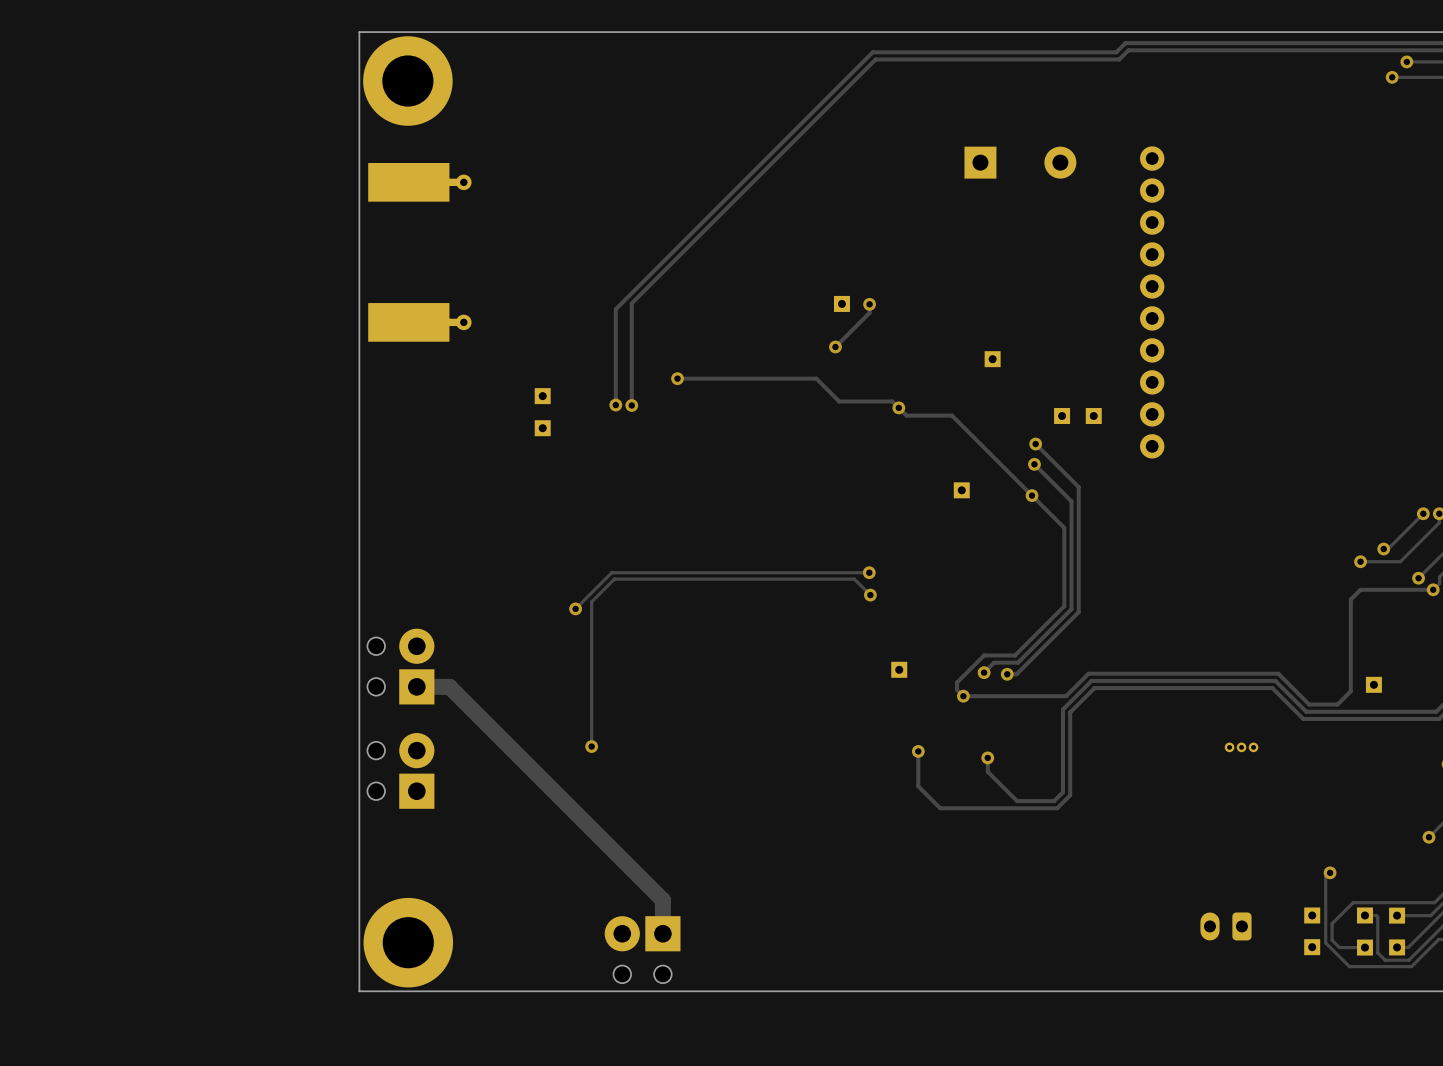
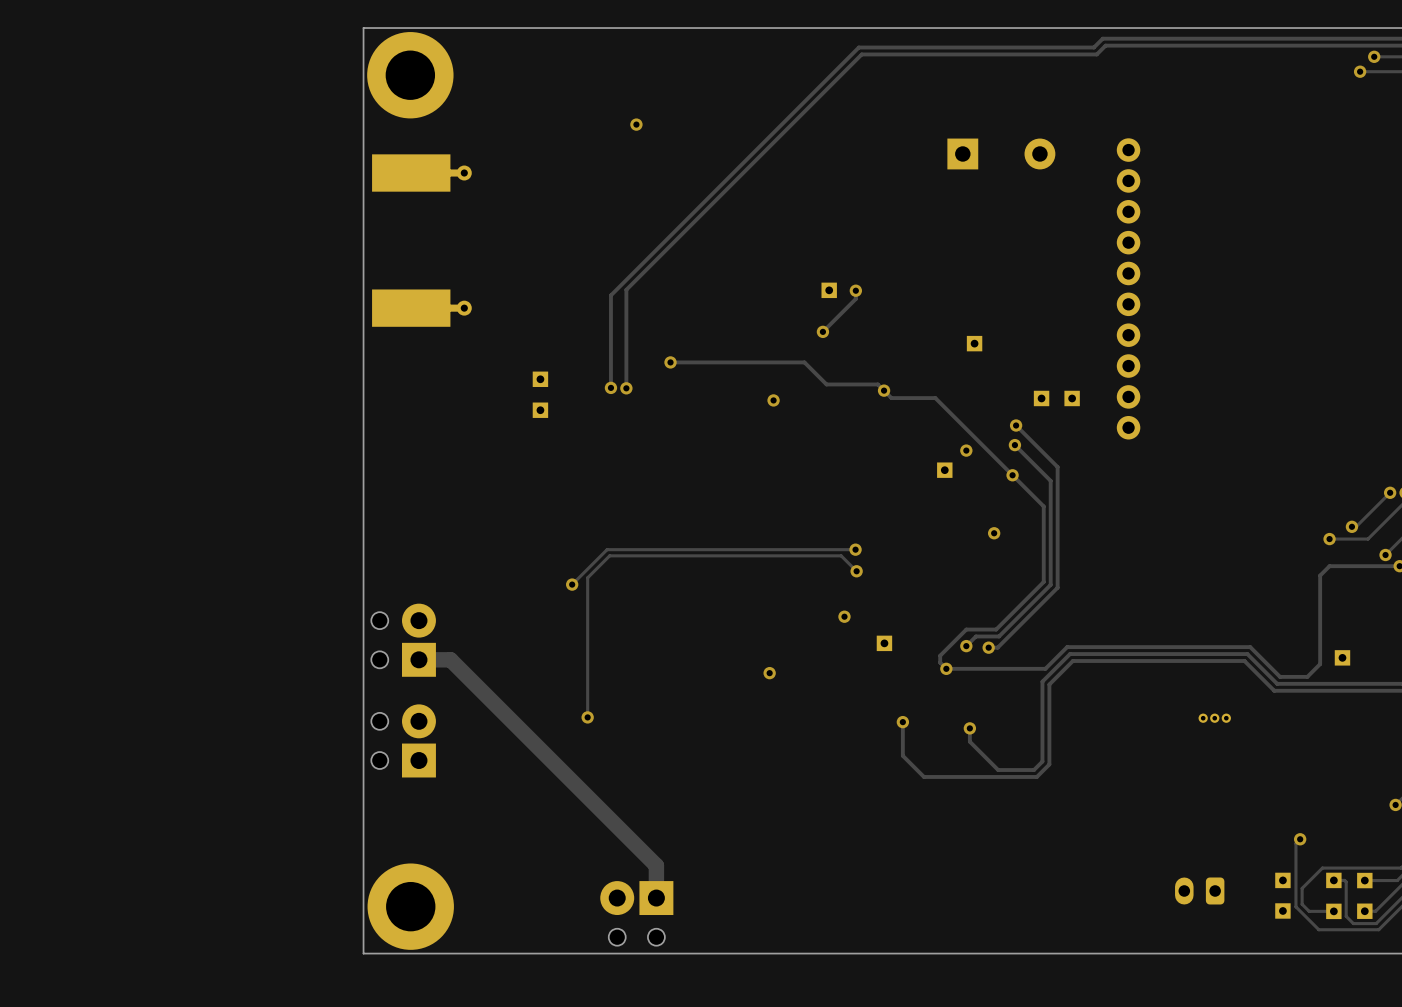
via: none -> (636, 124)
via: none -> (773, 400)
via: none -> (966, 450)
via: none -> (994, 533)
via: none -> (844, 616)
via: none -> (769, 673)

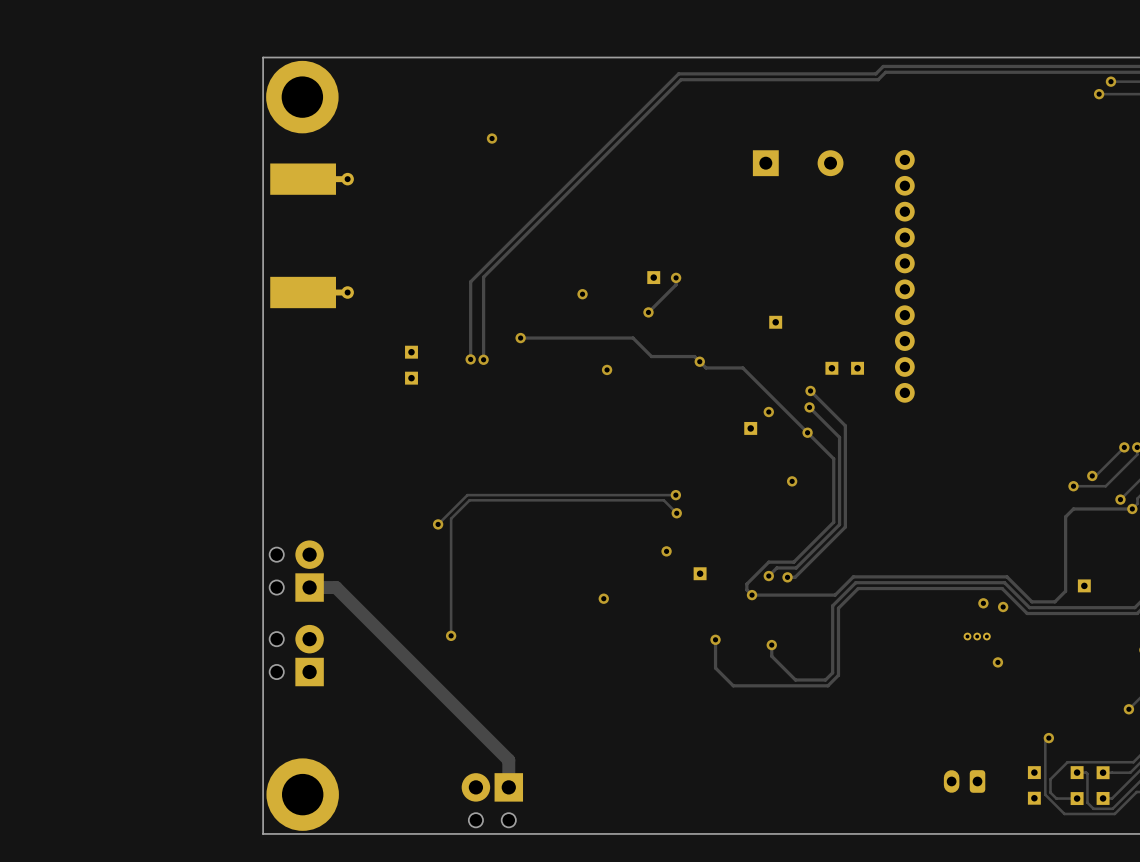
via: none -> (582, 294)
via: none -> (983, 603)
via: none -> (1003, 606)
via: none -> (997, 662)

